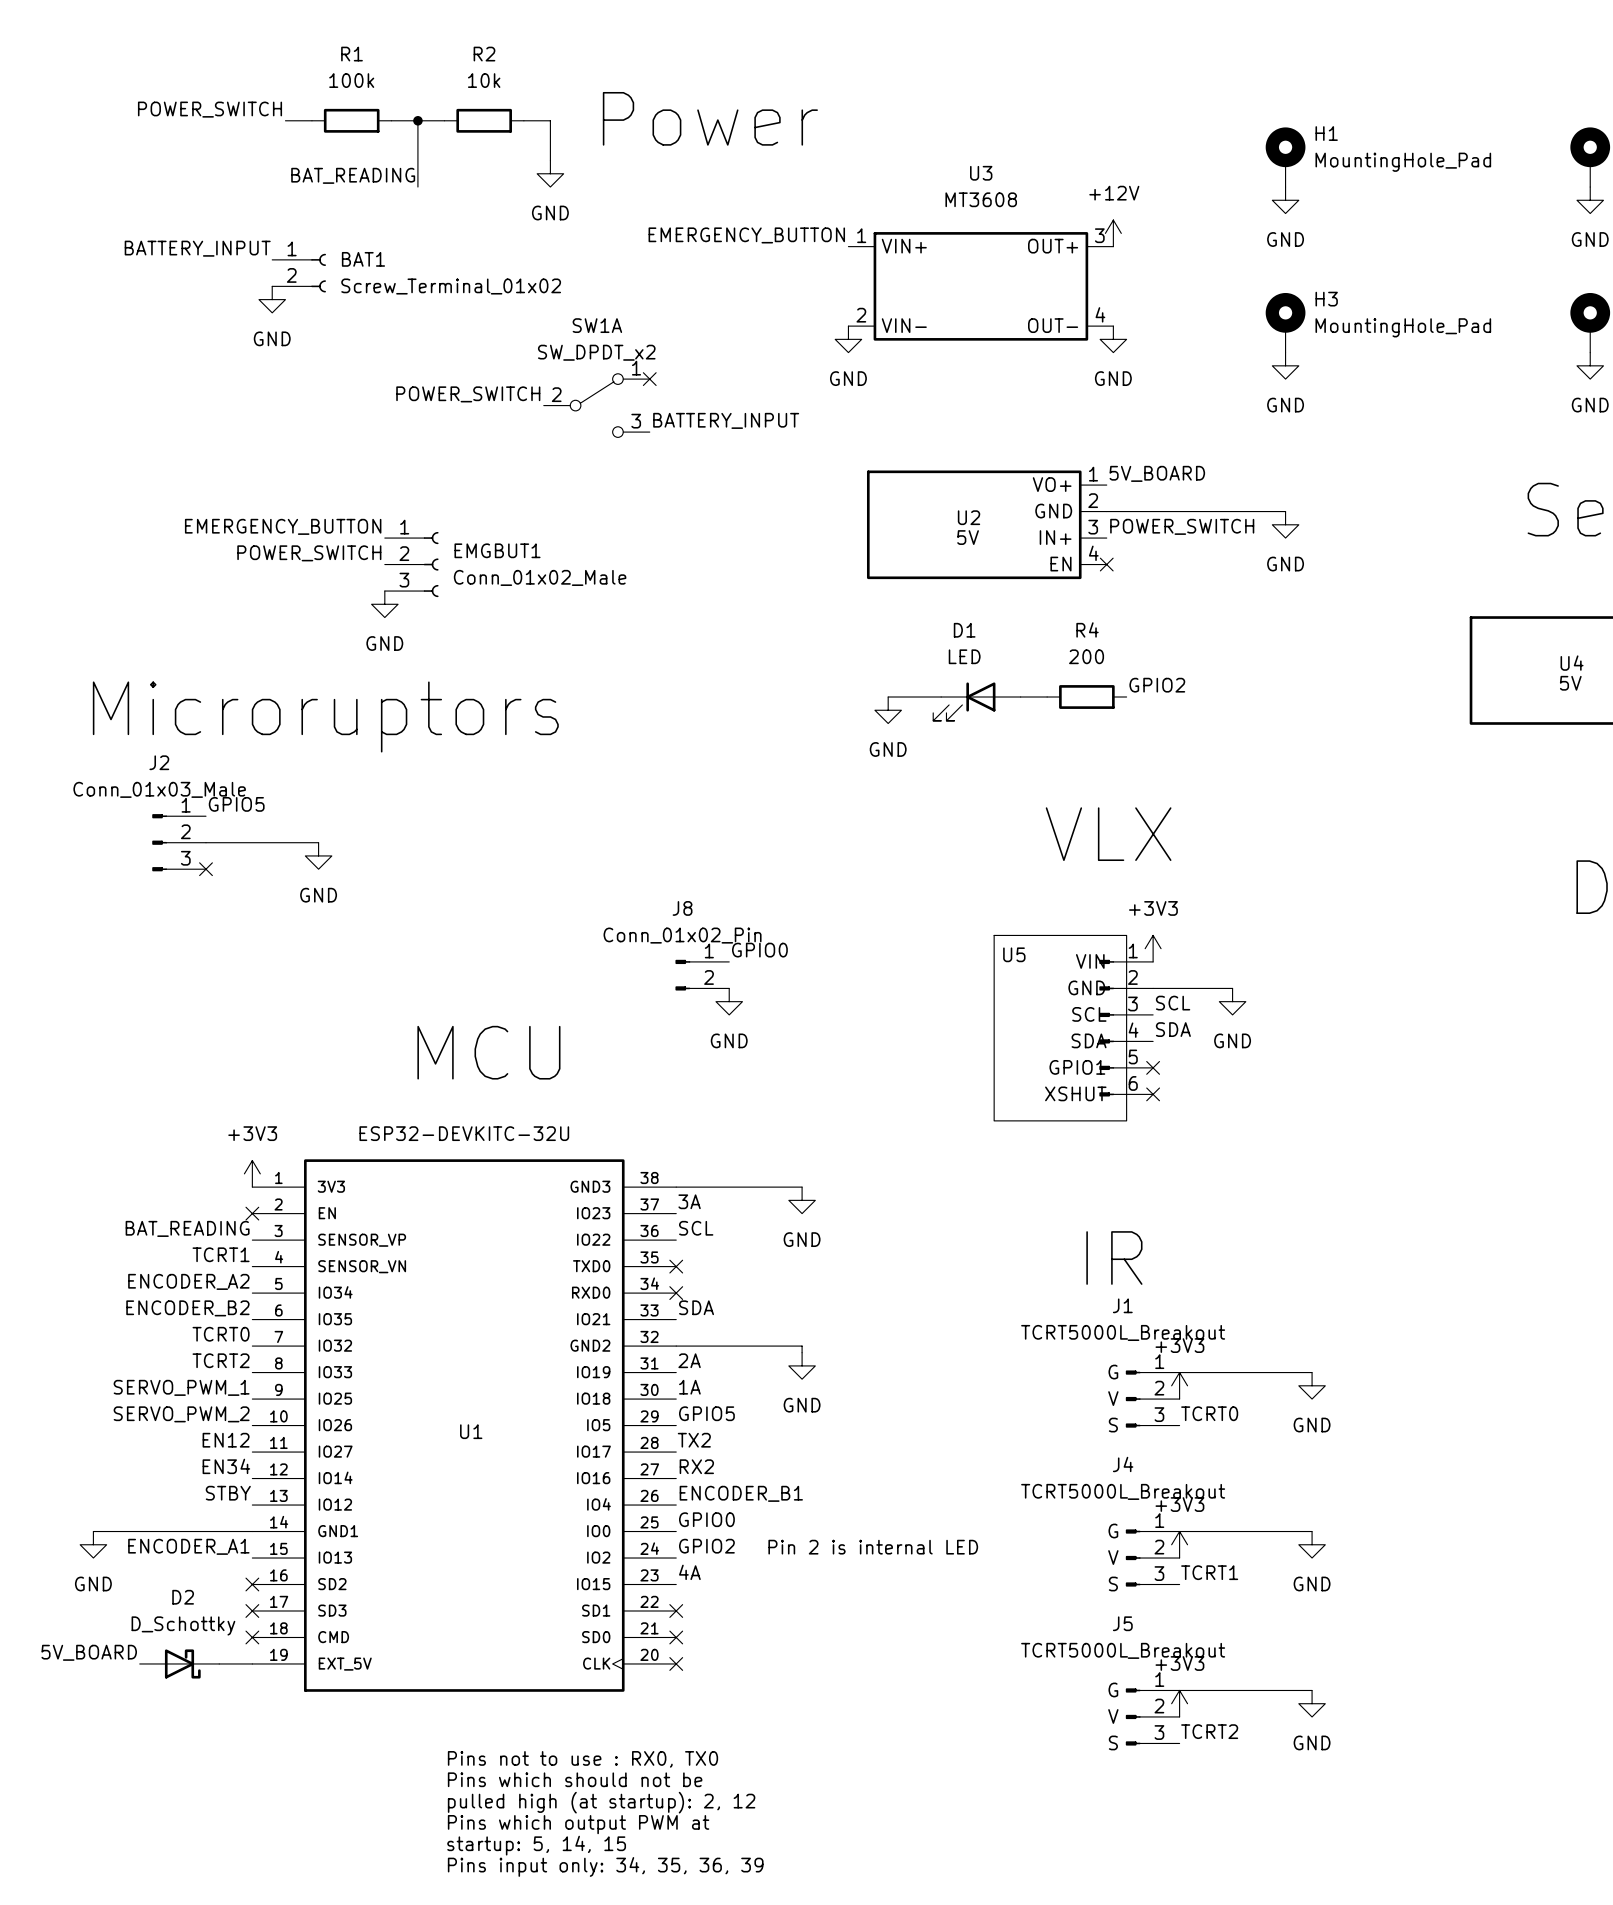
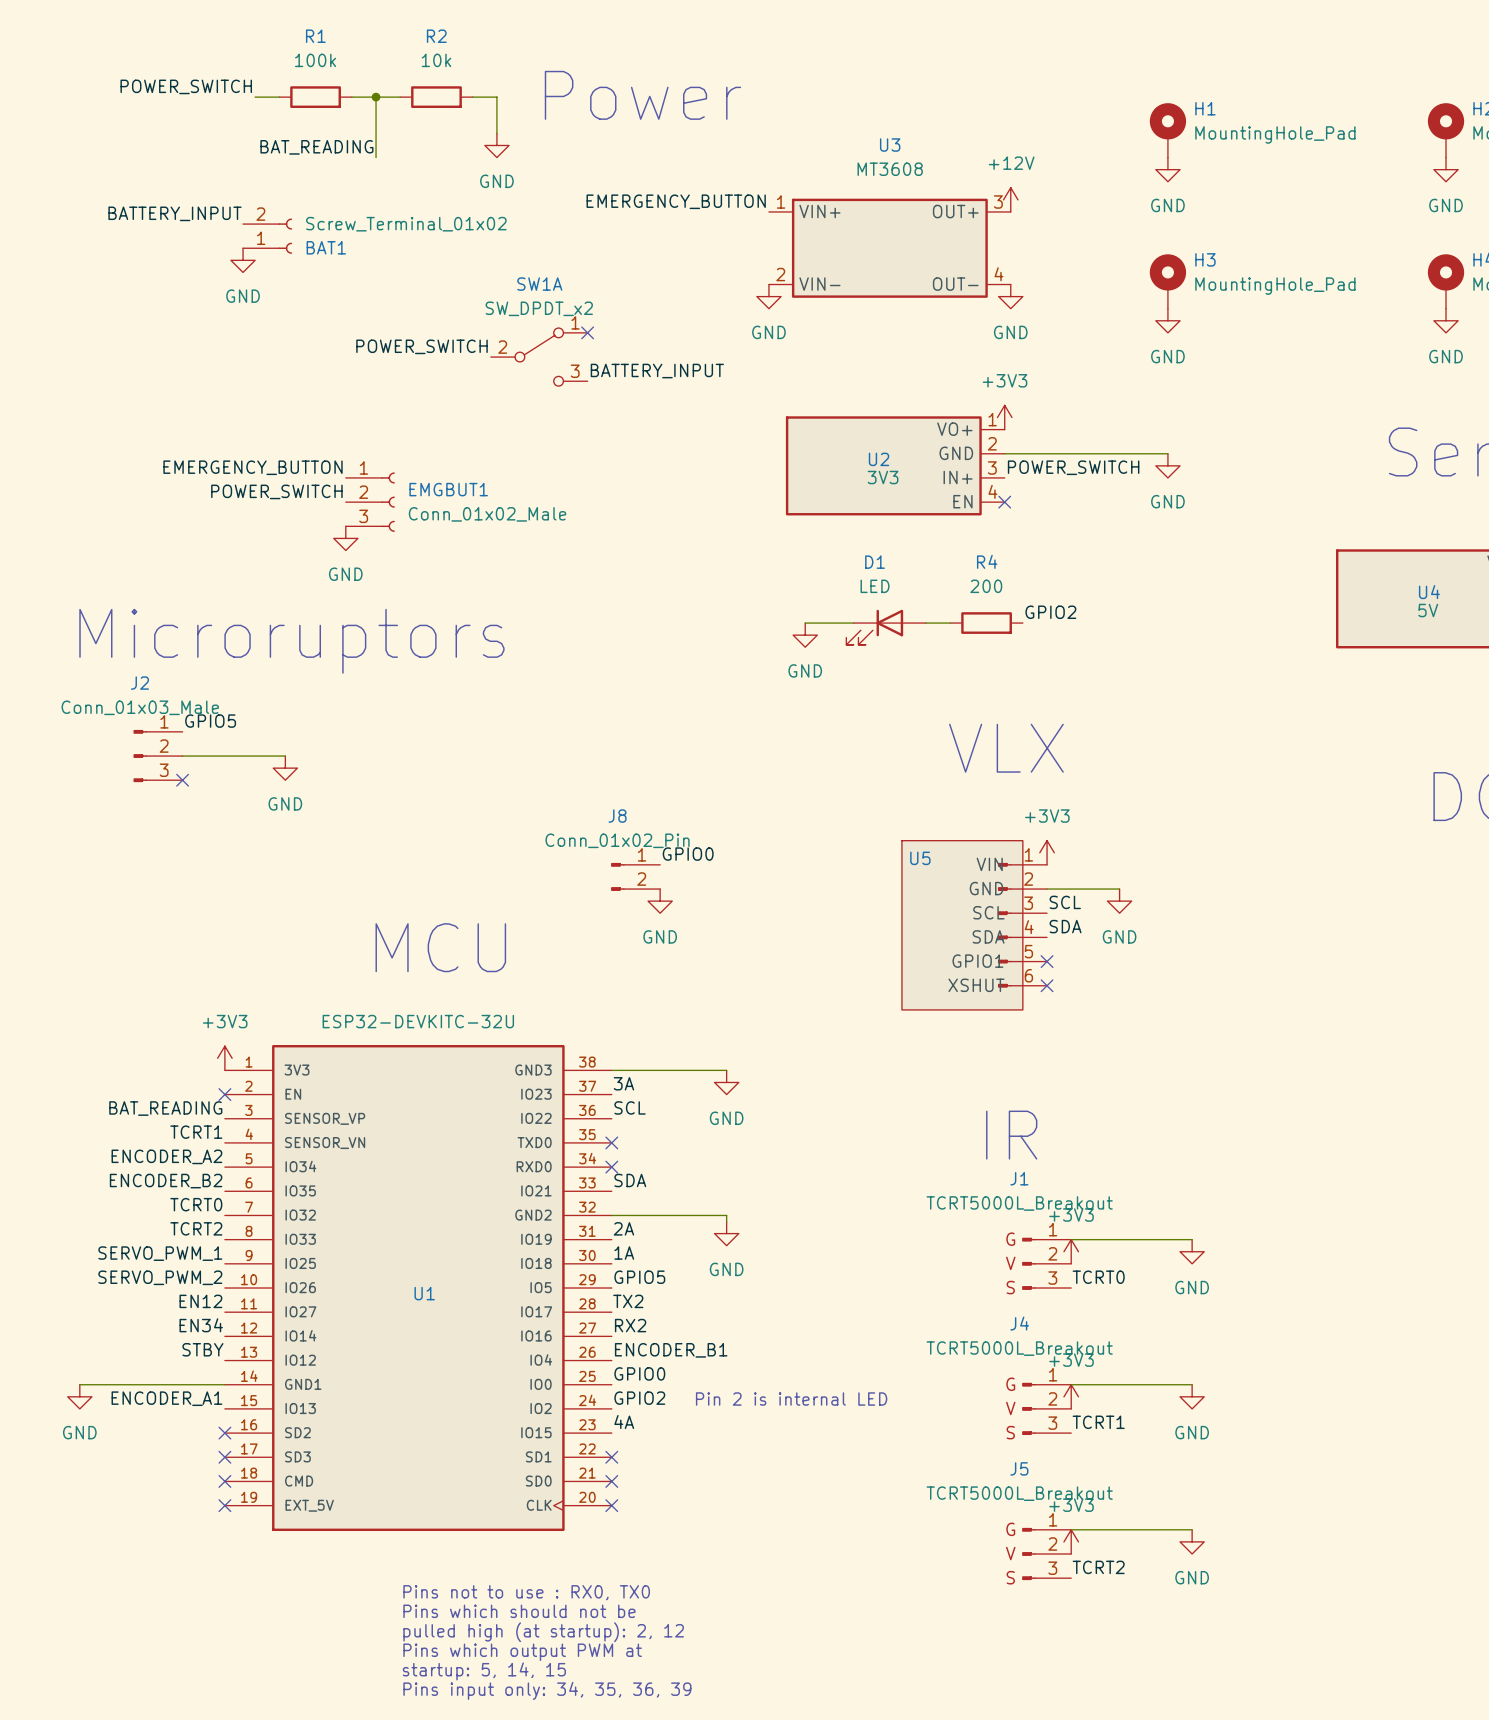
BAT1 flip: as is (318, 273) -> up-down (285, 236)
power symbol: none -> +3V3 (1004, 417)
label: 5V_BOARD (1157, 473) -> none
U2 value: 5V (968, 537) -> 3V3 (883, 477)
label: 5V_BOARD (89, 1652) -> none
D2: D_Schottky (179, 1663) -> none
wire: (219, 1663) (252, 1663) -> none
no-connect mark: none -> (224, 1505)

